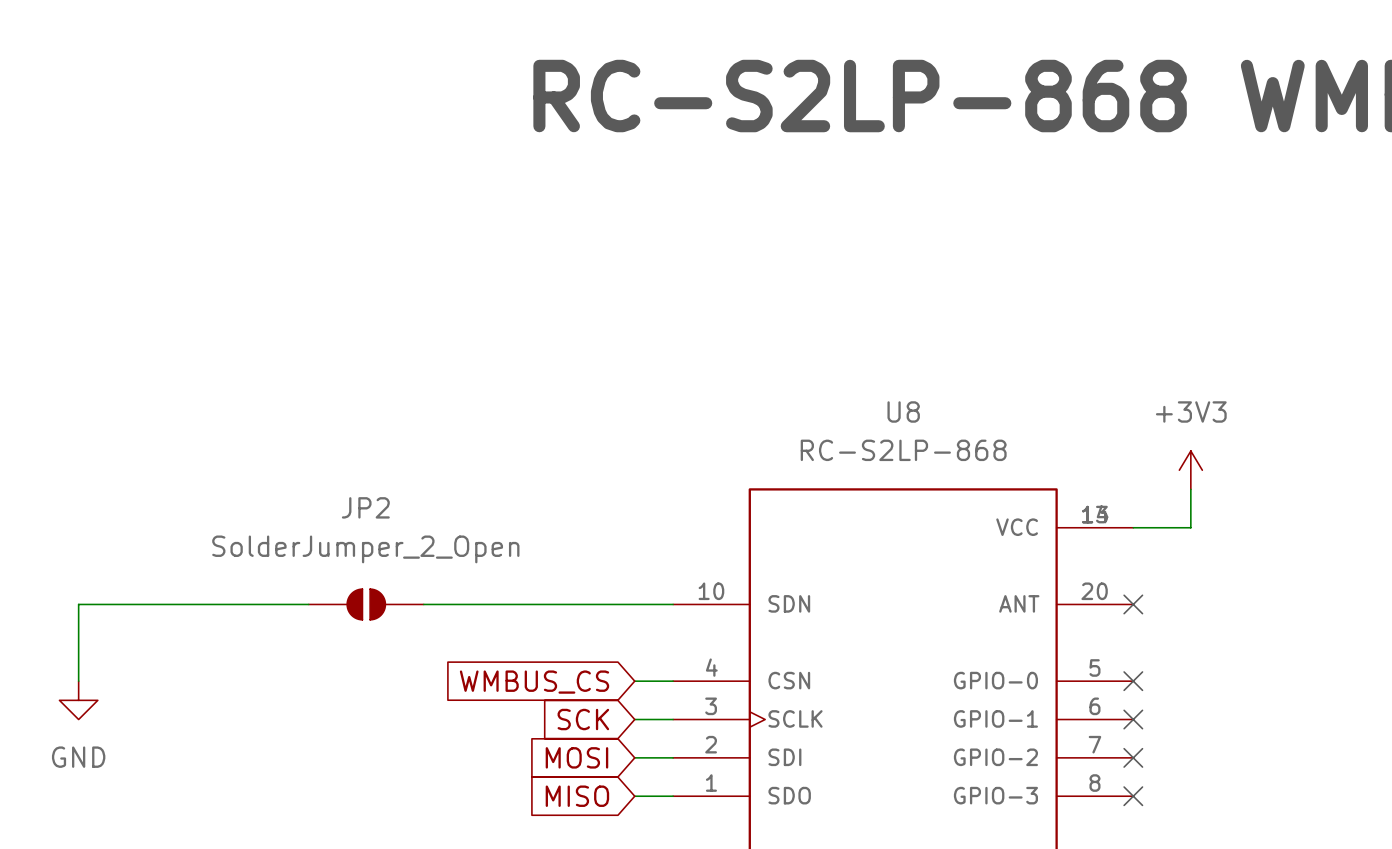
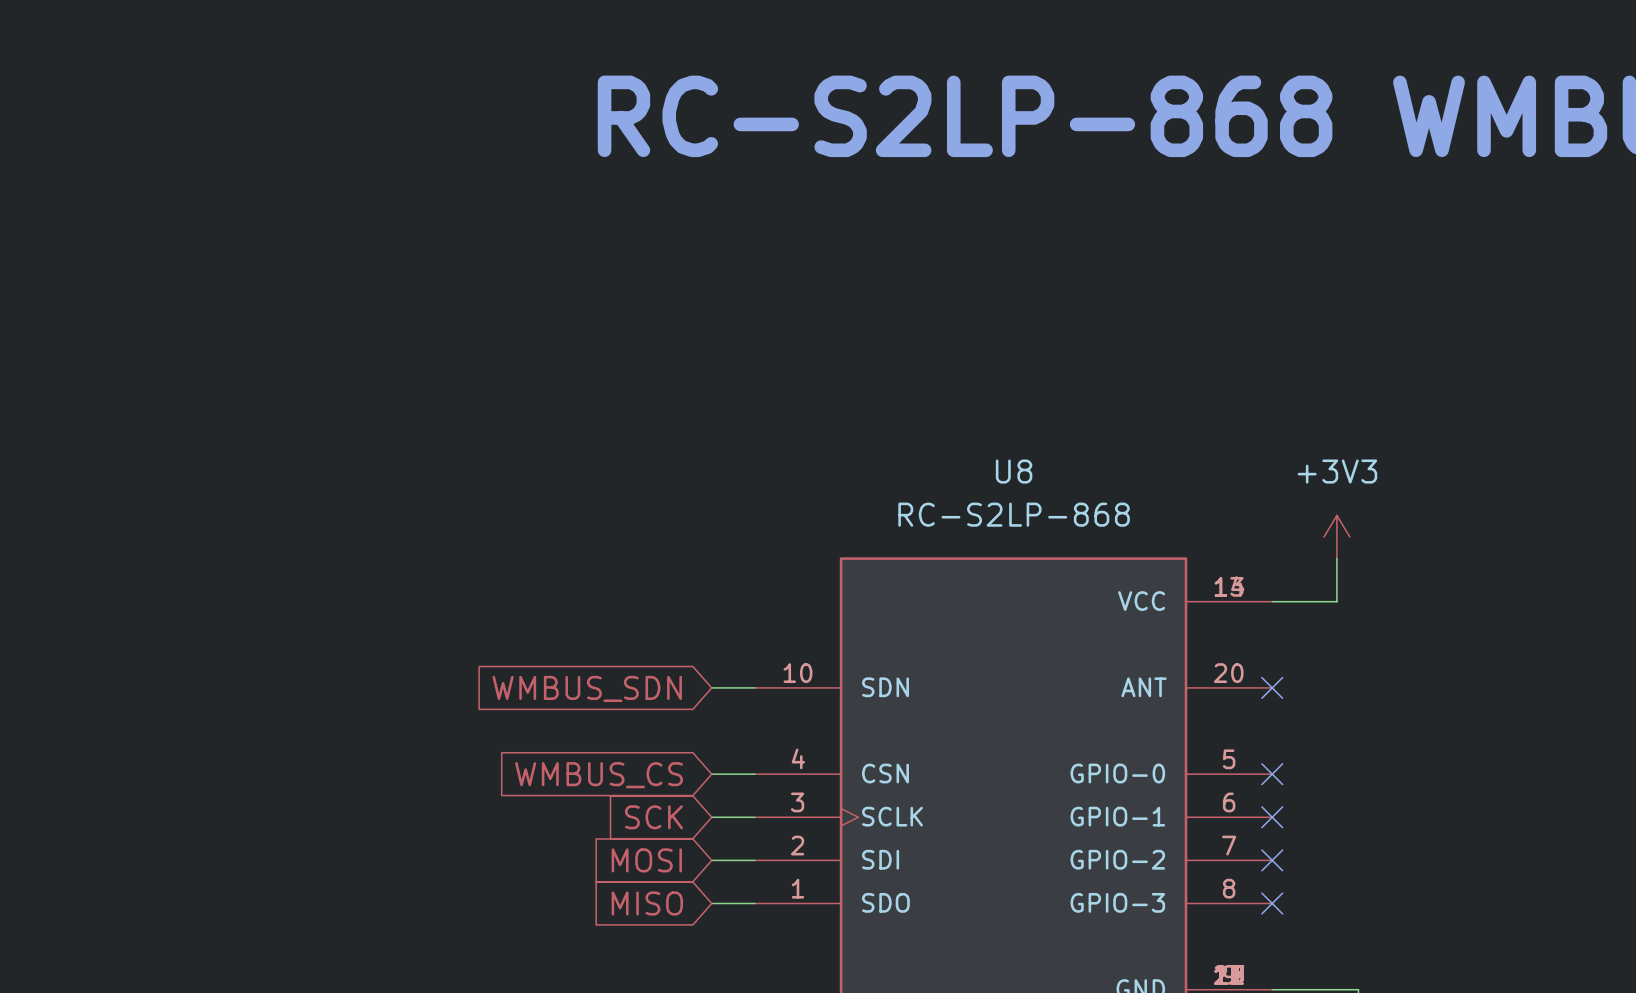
wire: (308, 604) (78, 604) (78, 681) -> none
JP2: SolderJumper_2_Open (366, 604) -> none
wire: (423, 604) (634, 604) -> none
global label: none -> WMBUS_SDN (587, 688)
power symbol: GND (78, 700) -> none

